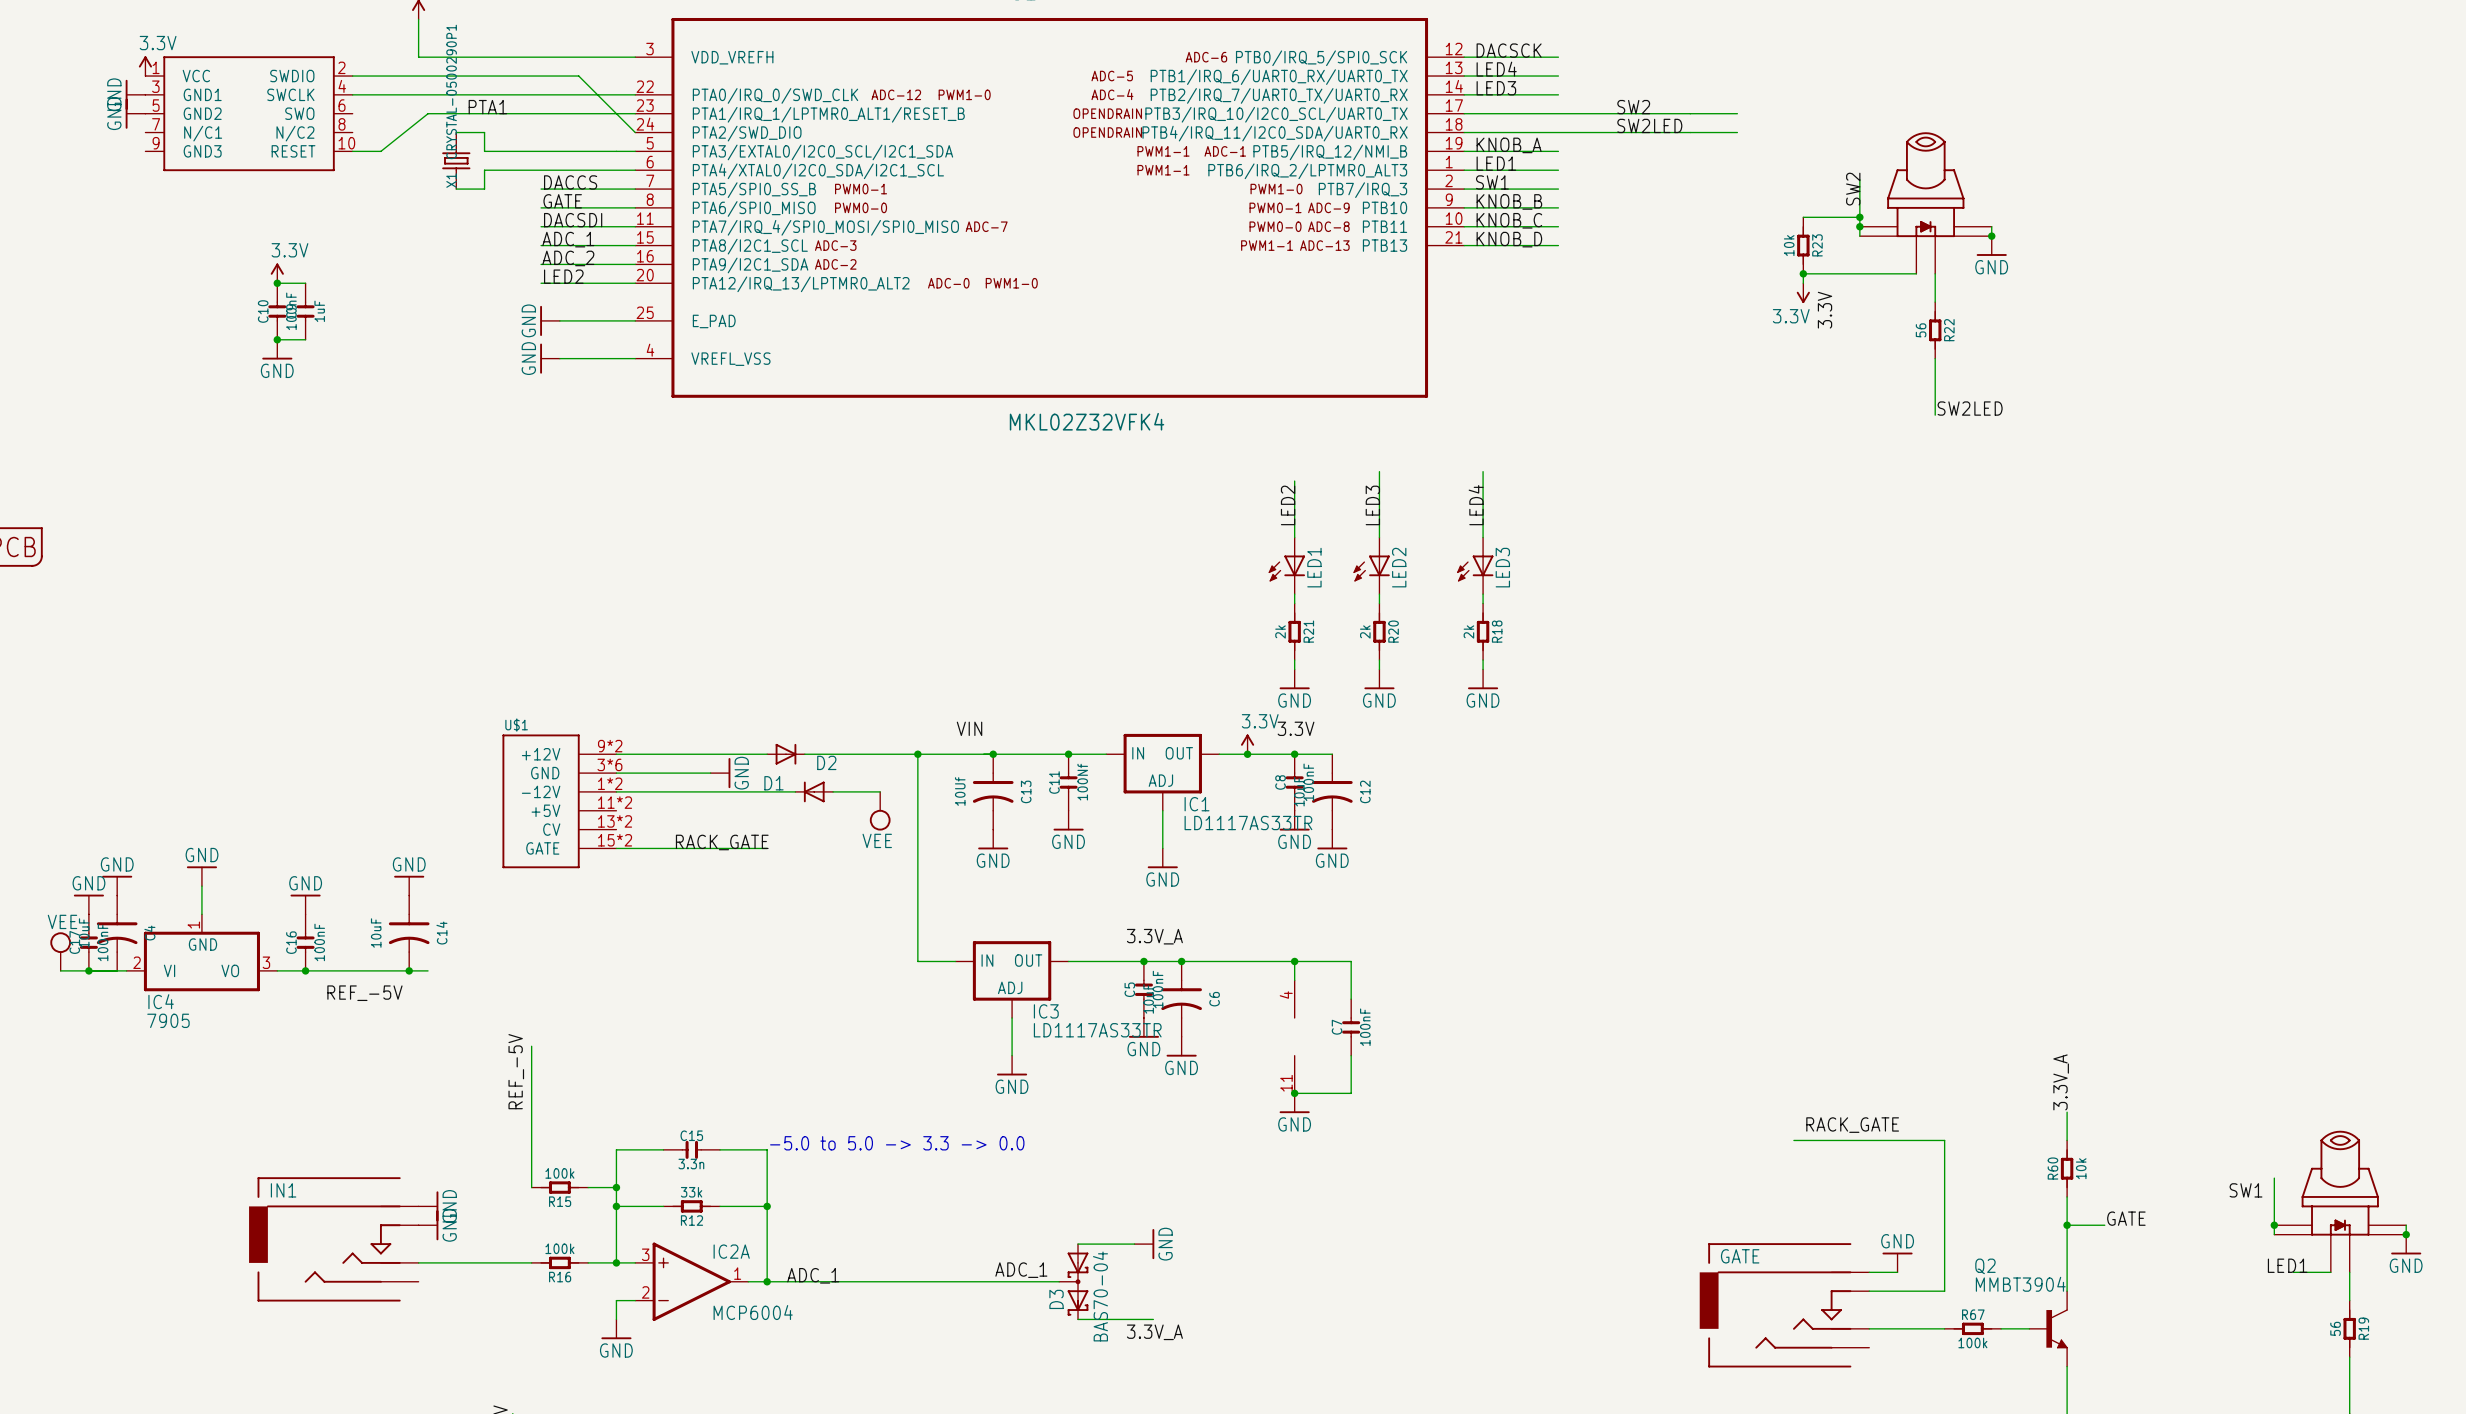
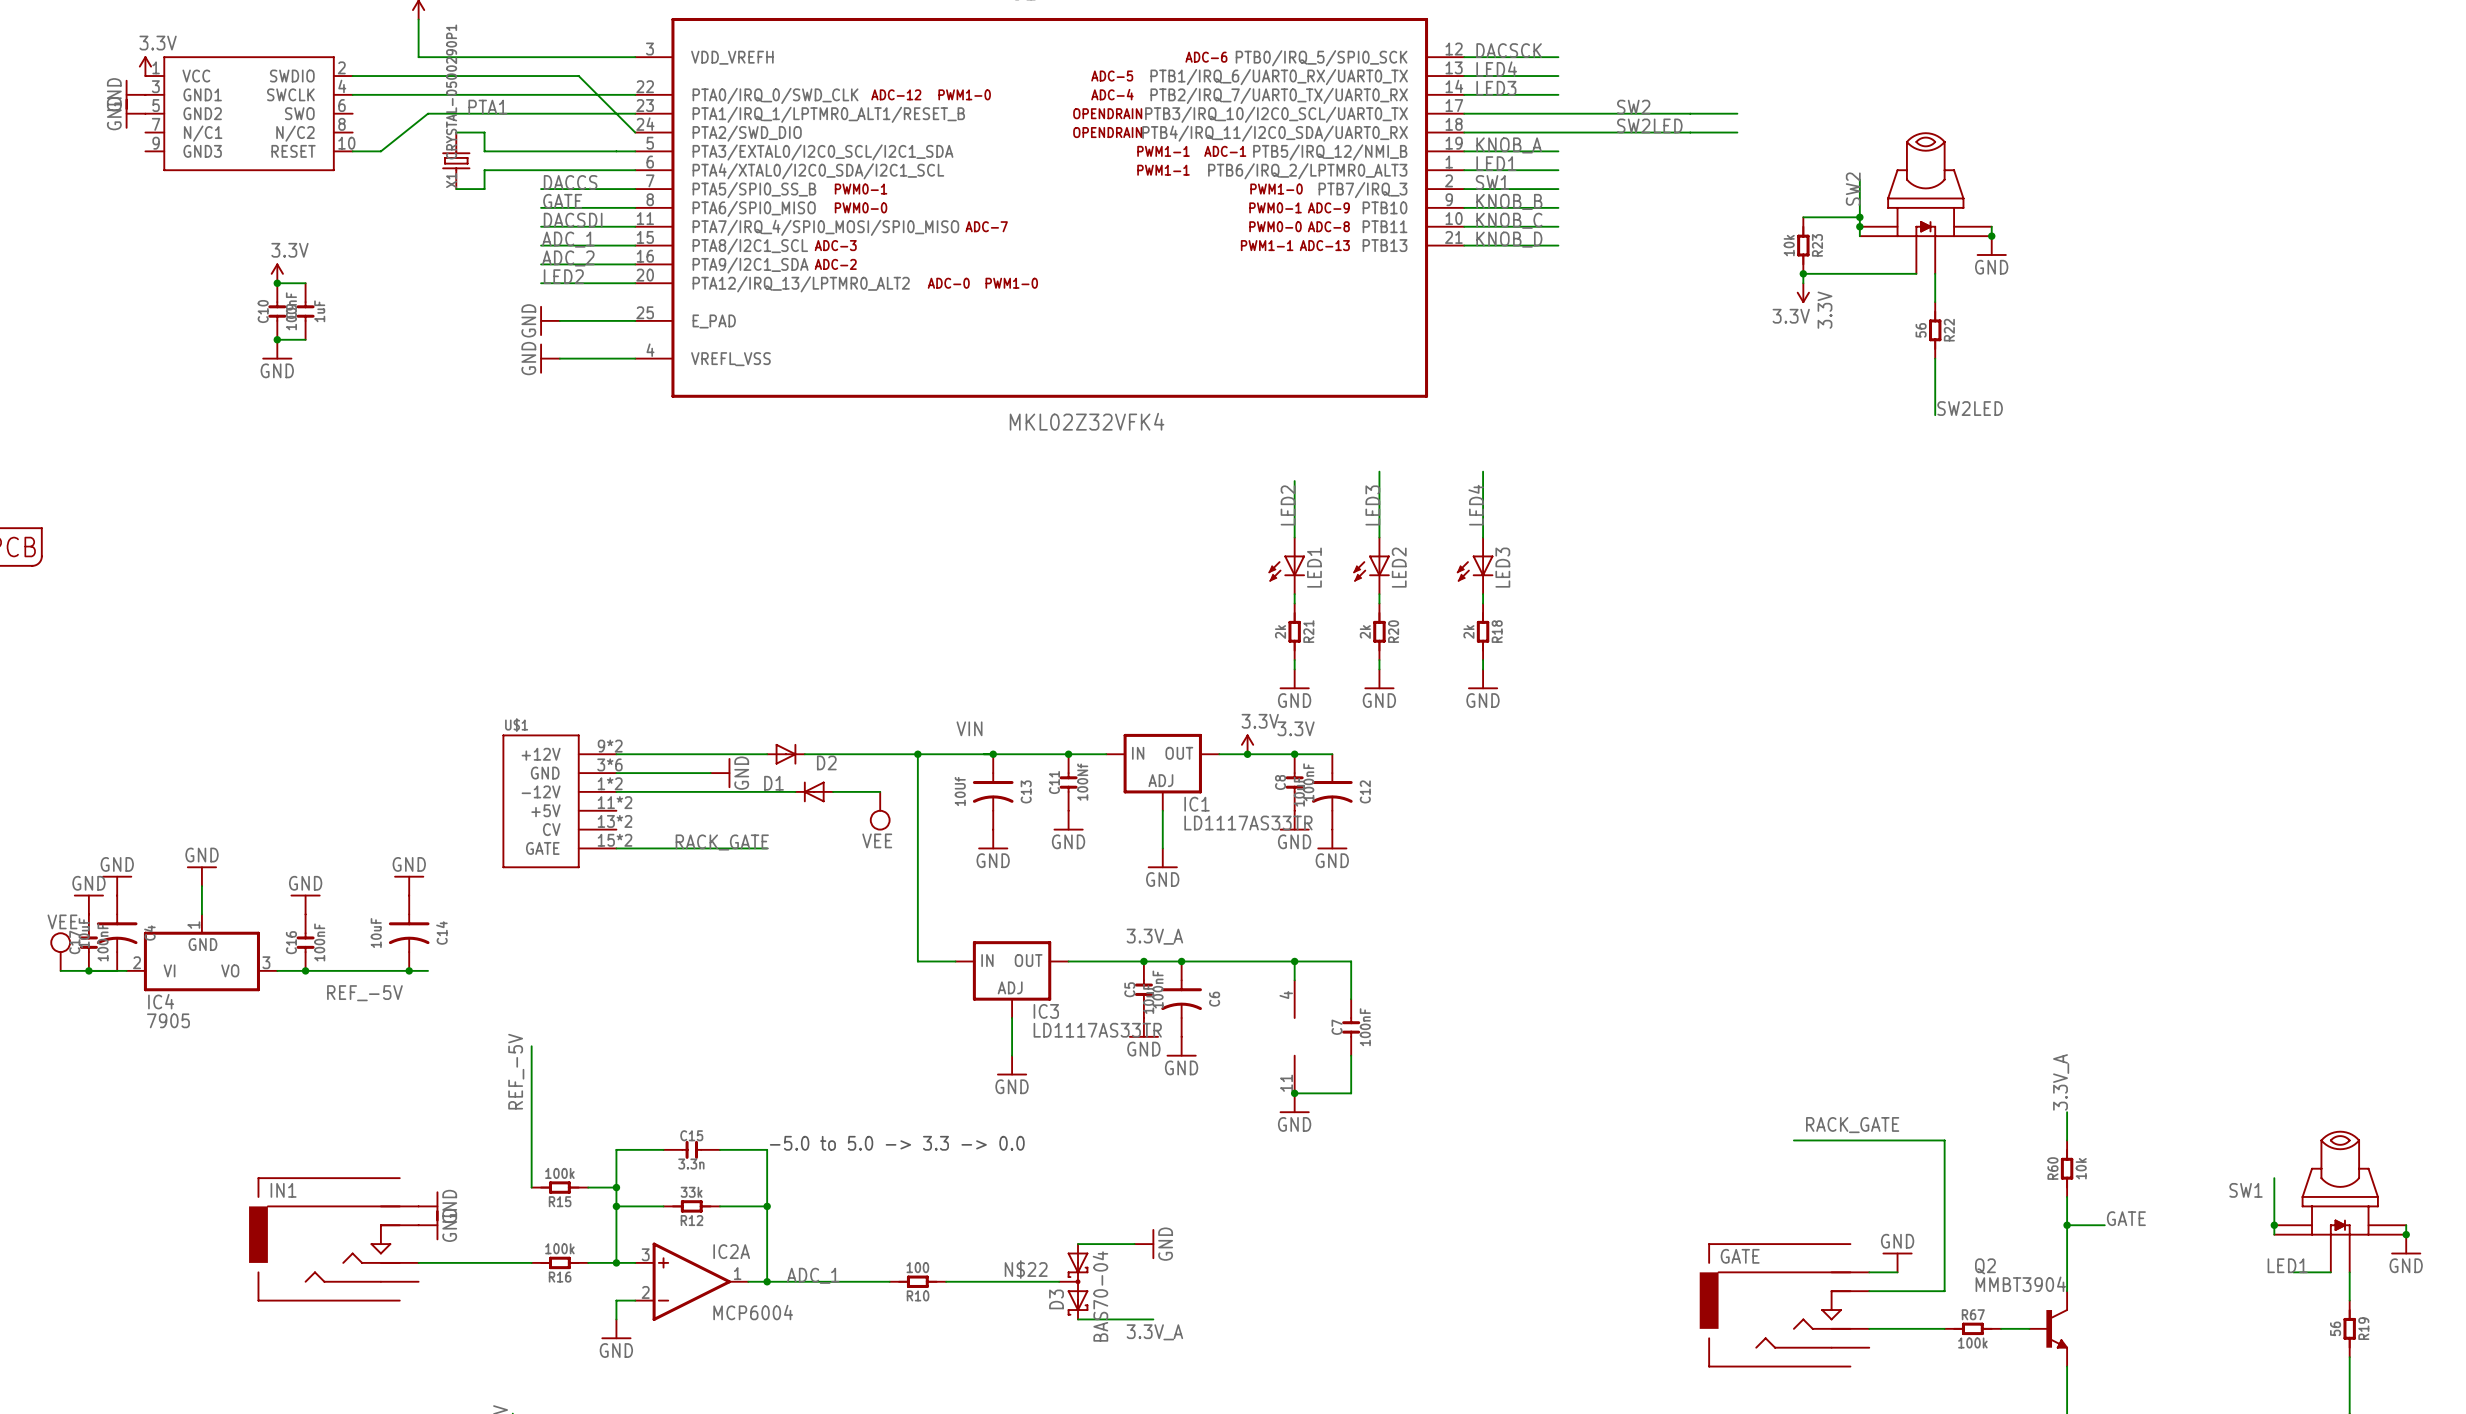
label: ADC_1 (1021, 1270) -> N$22 (1026, 1269)
R10: none -> 100 (917, 1281)

